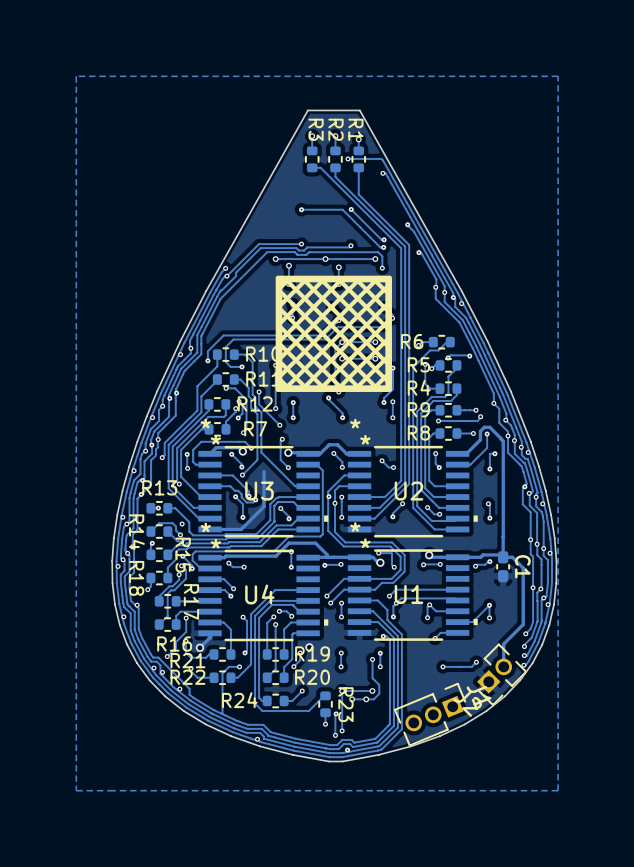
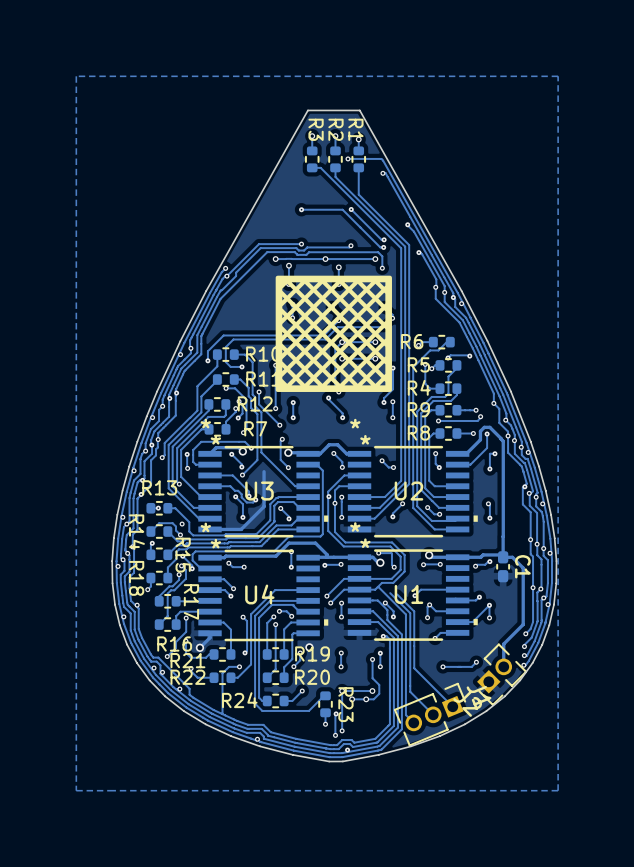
track: none -> (377, 587) (405, 614) (405, 715) (413, 722)
track: (420, 589) (395, 589) (389, 596) -> (420, 589) (414, 595)
track: none -> (390, 593) (410, 613) (410, 691) (433, 714)
track: none -> (397, 594) (414, 611) (414, 668) (452, 706)
via: none -> (414, 595)
via: (389, 596) -> none
track: none -> (479, 597) (475, 600) (457, 600)
via: none -> (479, 597)
track: (455, 598) (401, 598) (393, 606) (393, 616) -> (385, 602) (393, 611) (393, 616)
via: none -> (385, 602)
via: (396, 603) -> none

